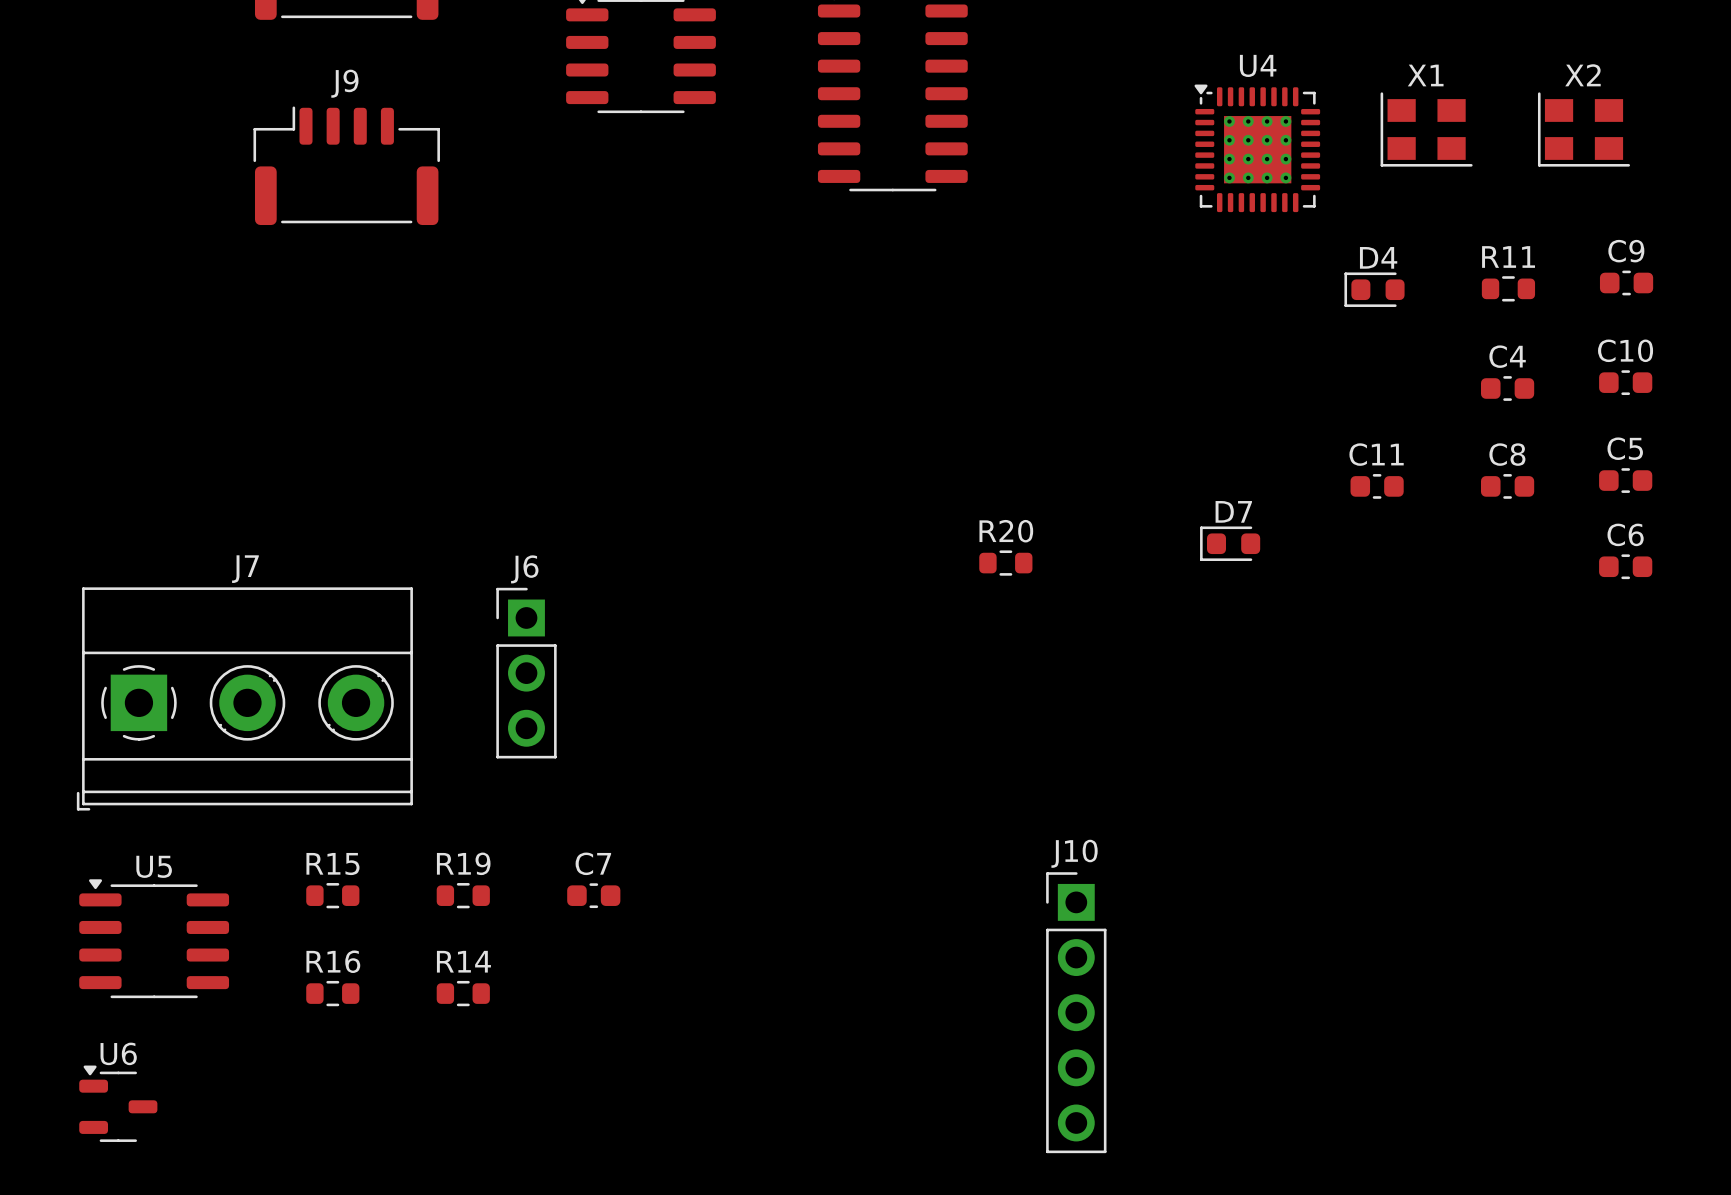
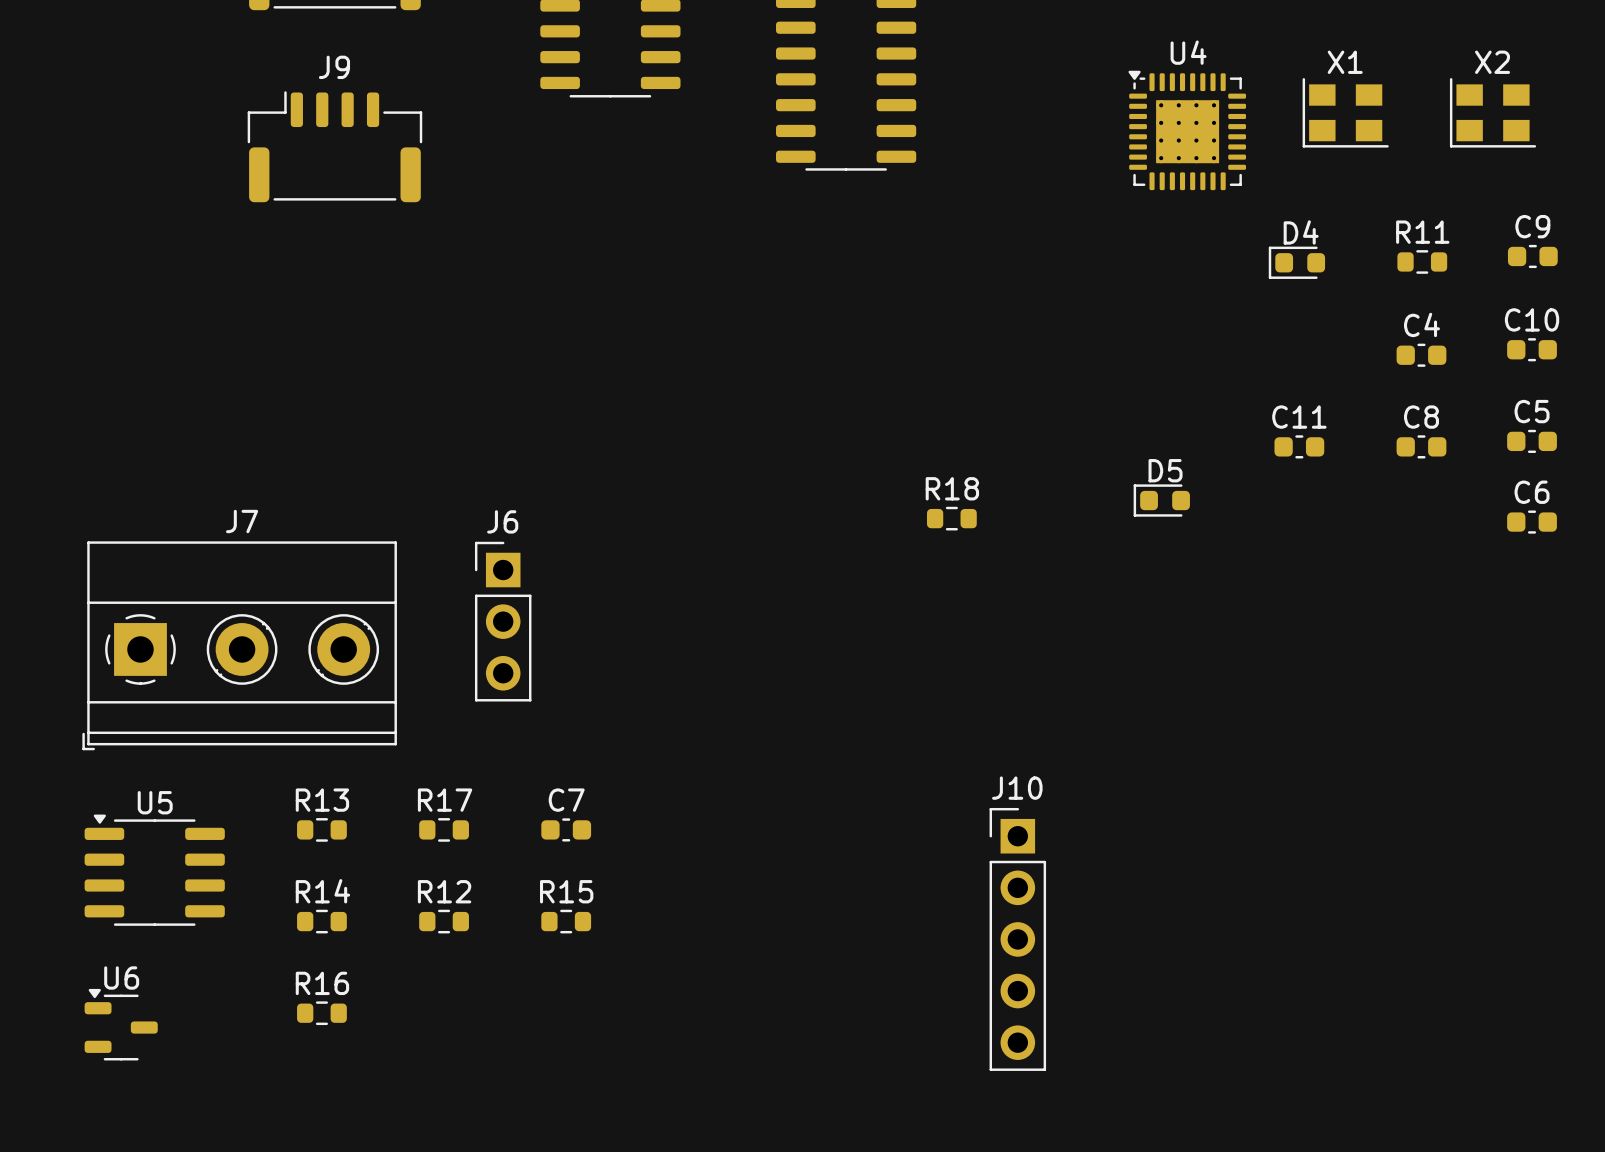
D7 name: D7 (1233, 511) -> D5 (1165, 470)
R20 name: R20 (1006, 531) -> R18 (952, 488)
R19 name: R19 (463, 863) -> R17 (445, 800)
R15 name: R15 (332, 864) -> R13 (322, 800)
R16 name: R16 (333, 961) -> R14 (322, 891)
R14 name: R14 (463, 961) -> R12 (444, 891)
R15: none -> (566, 921)
R16: none -> (321, 1013)

